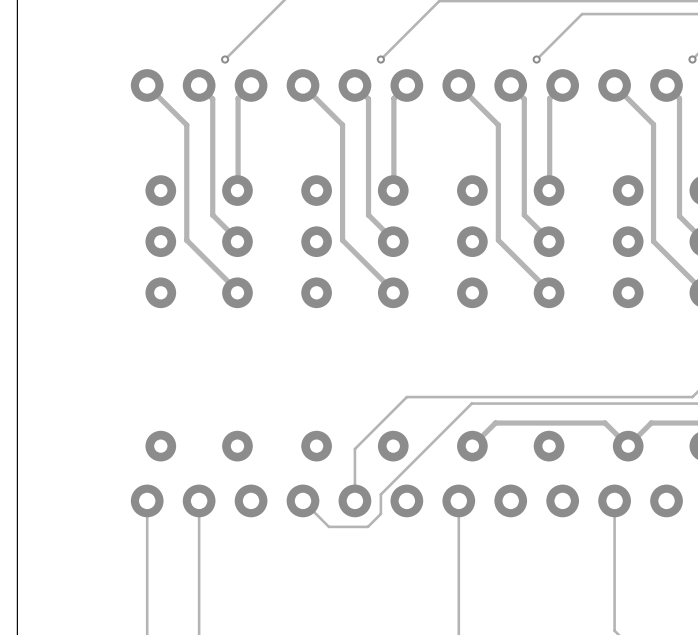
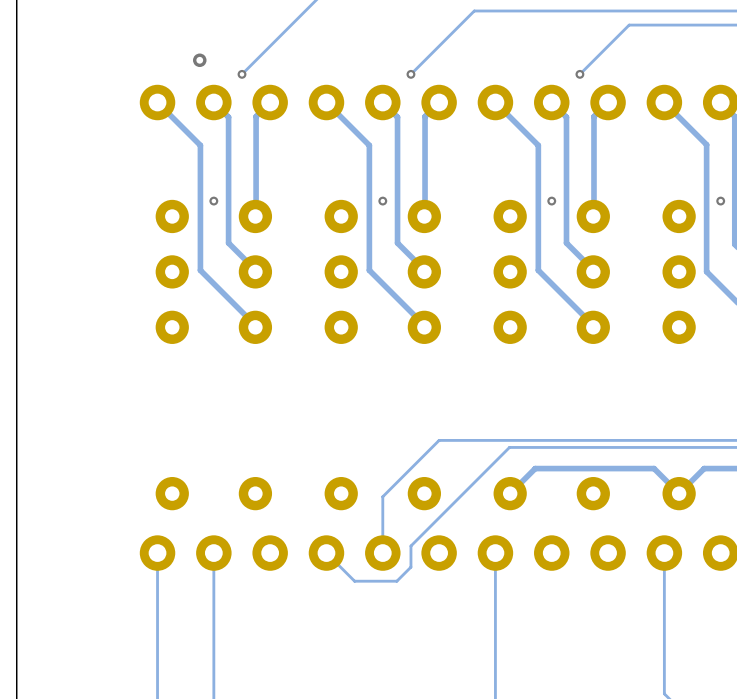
via: none -> (199, 60)
via: none -> (213, 201)
via: none -> (382, 201)
via: none -> (551, 201)
via: none -> (720, 201)

